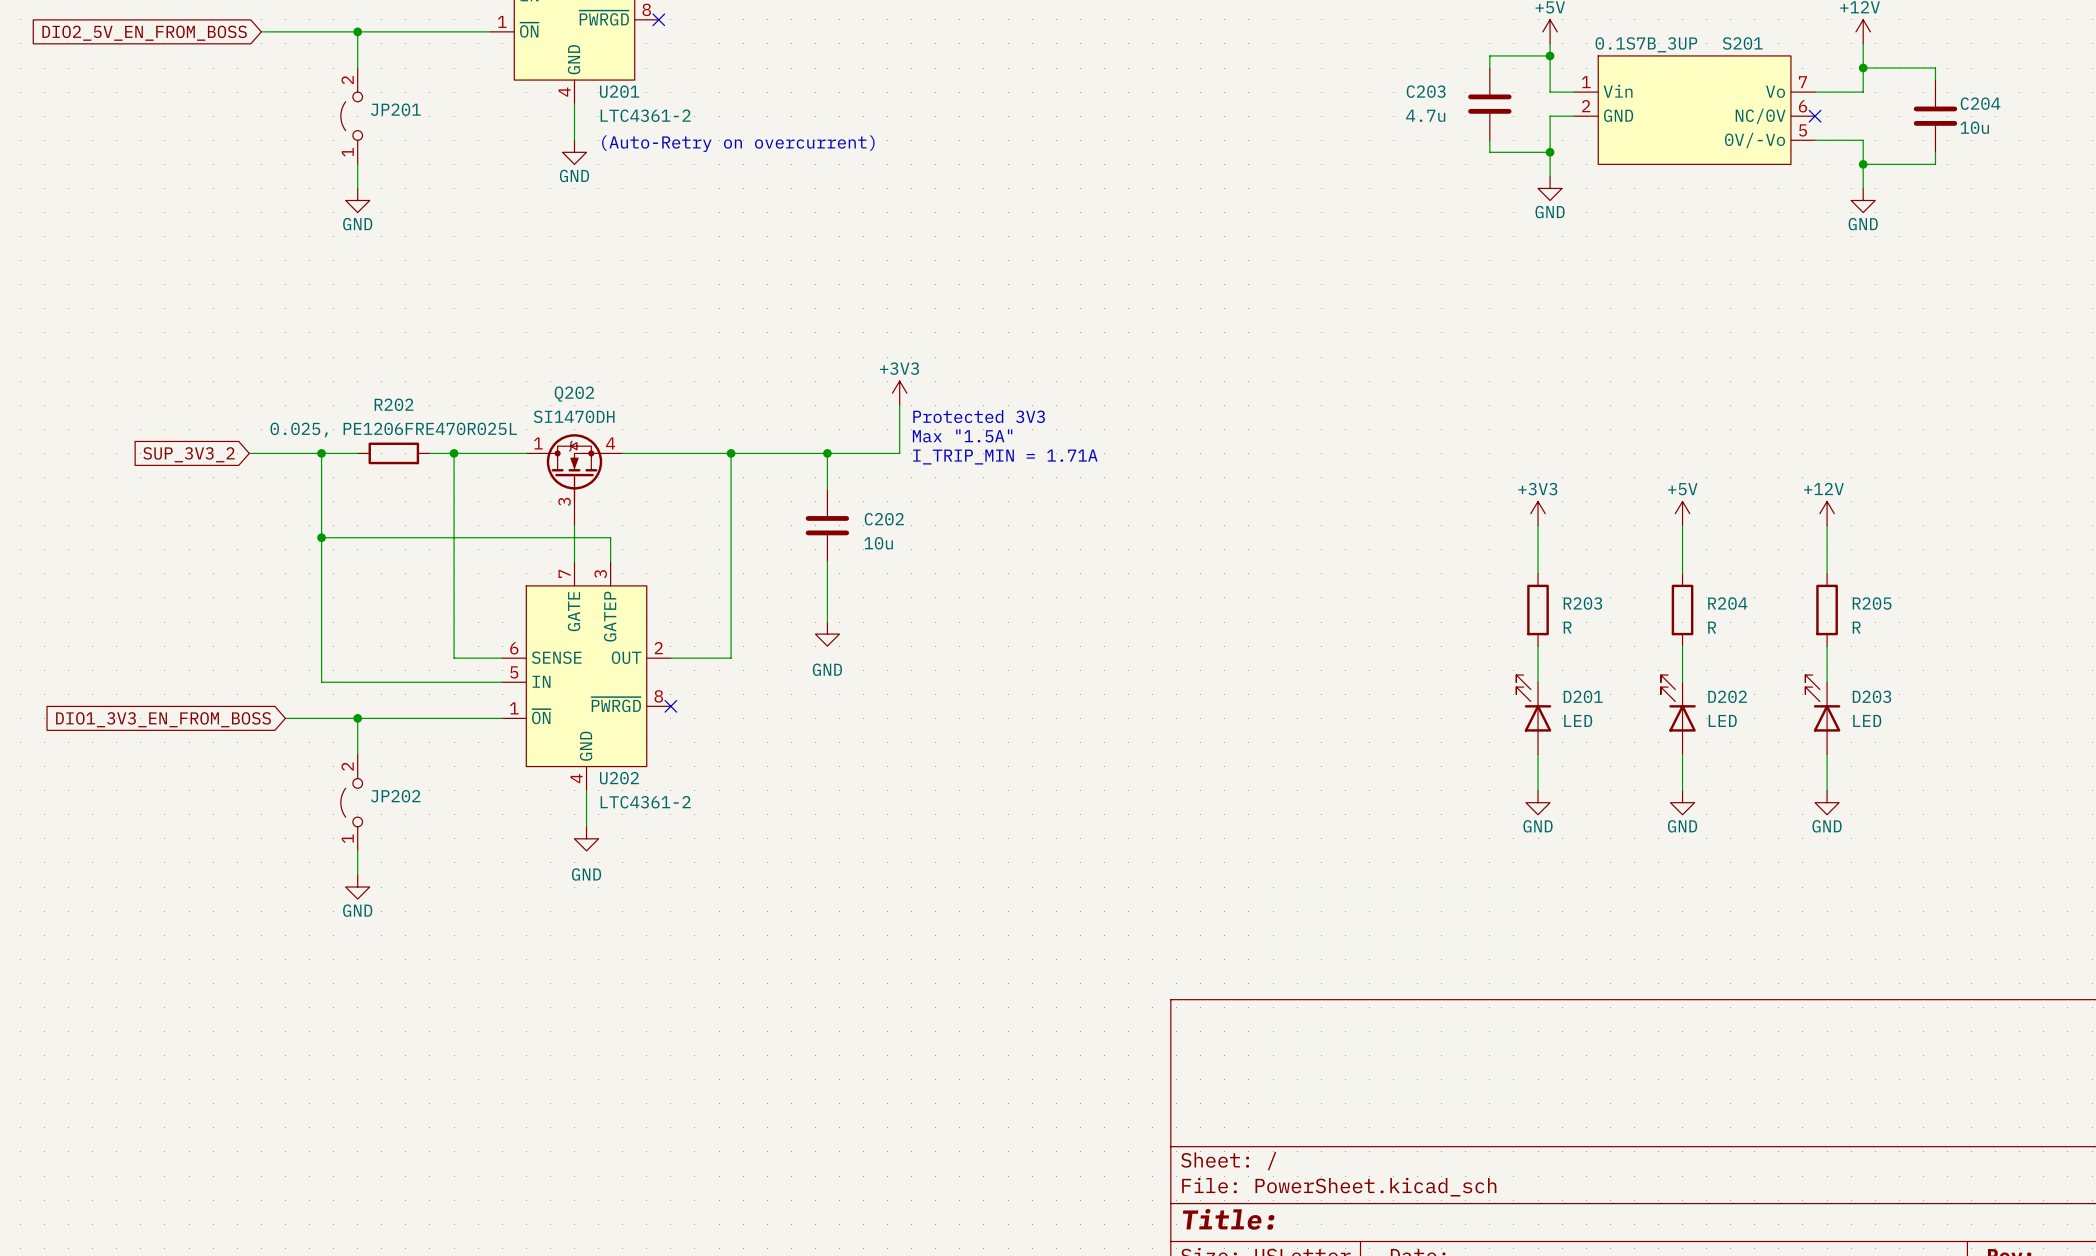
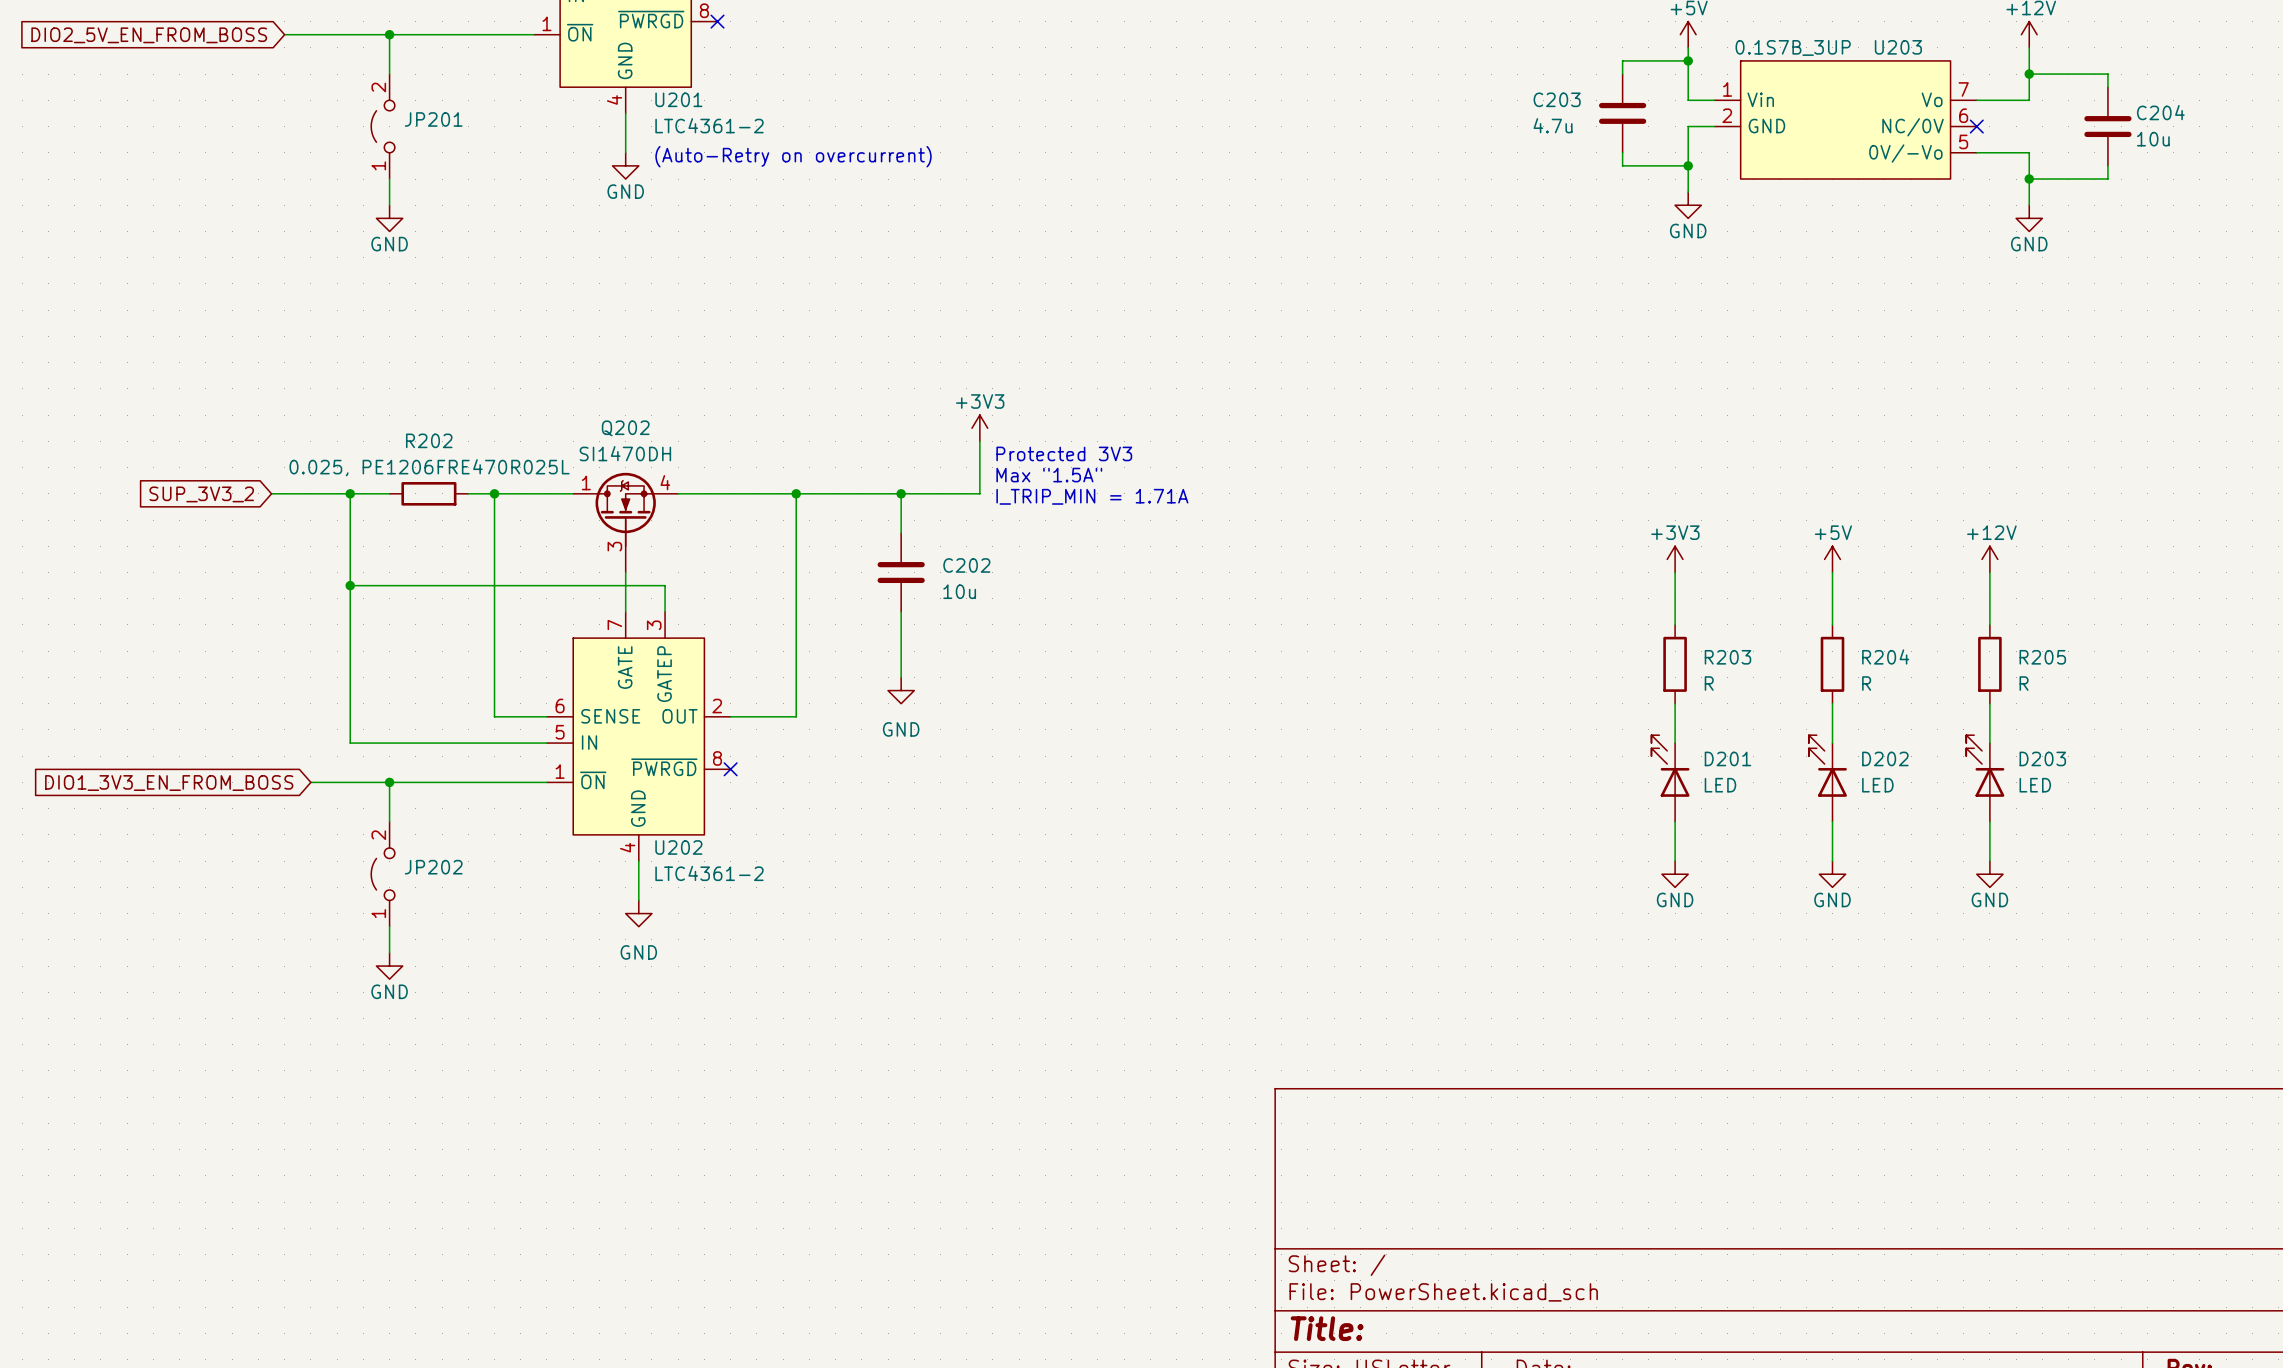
S201 name: S201 (1742, 43) -> U203 (1898, 47)

